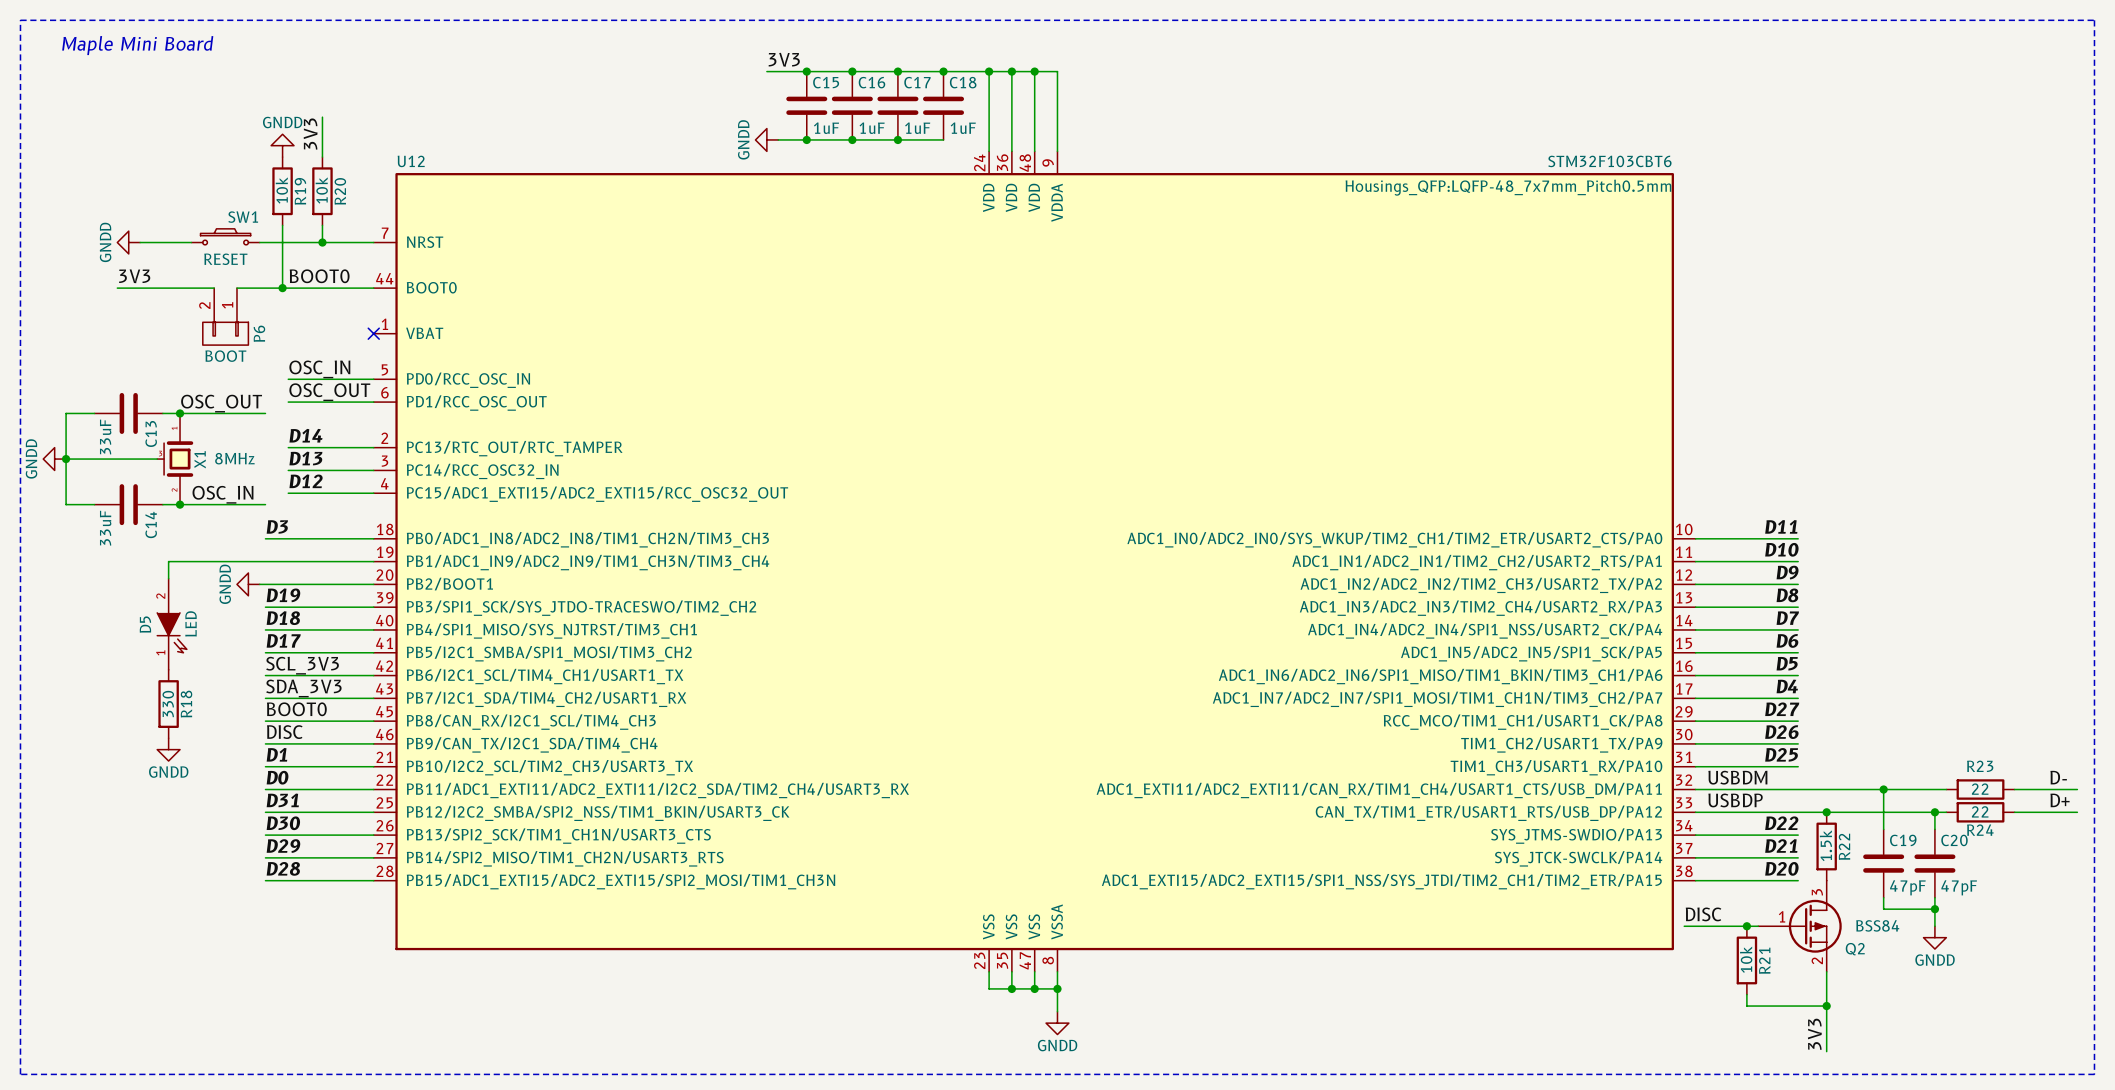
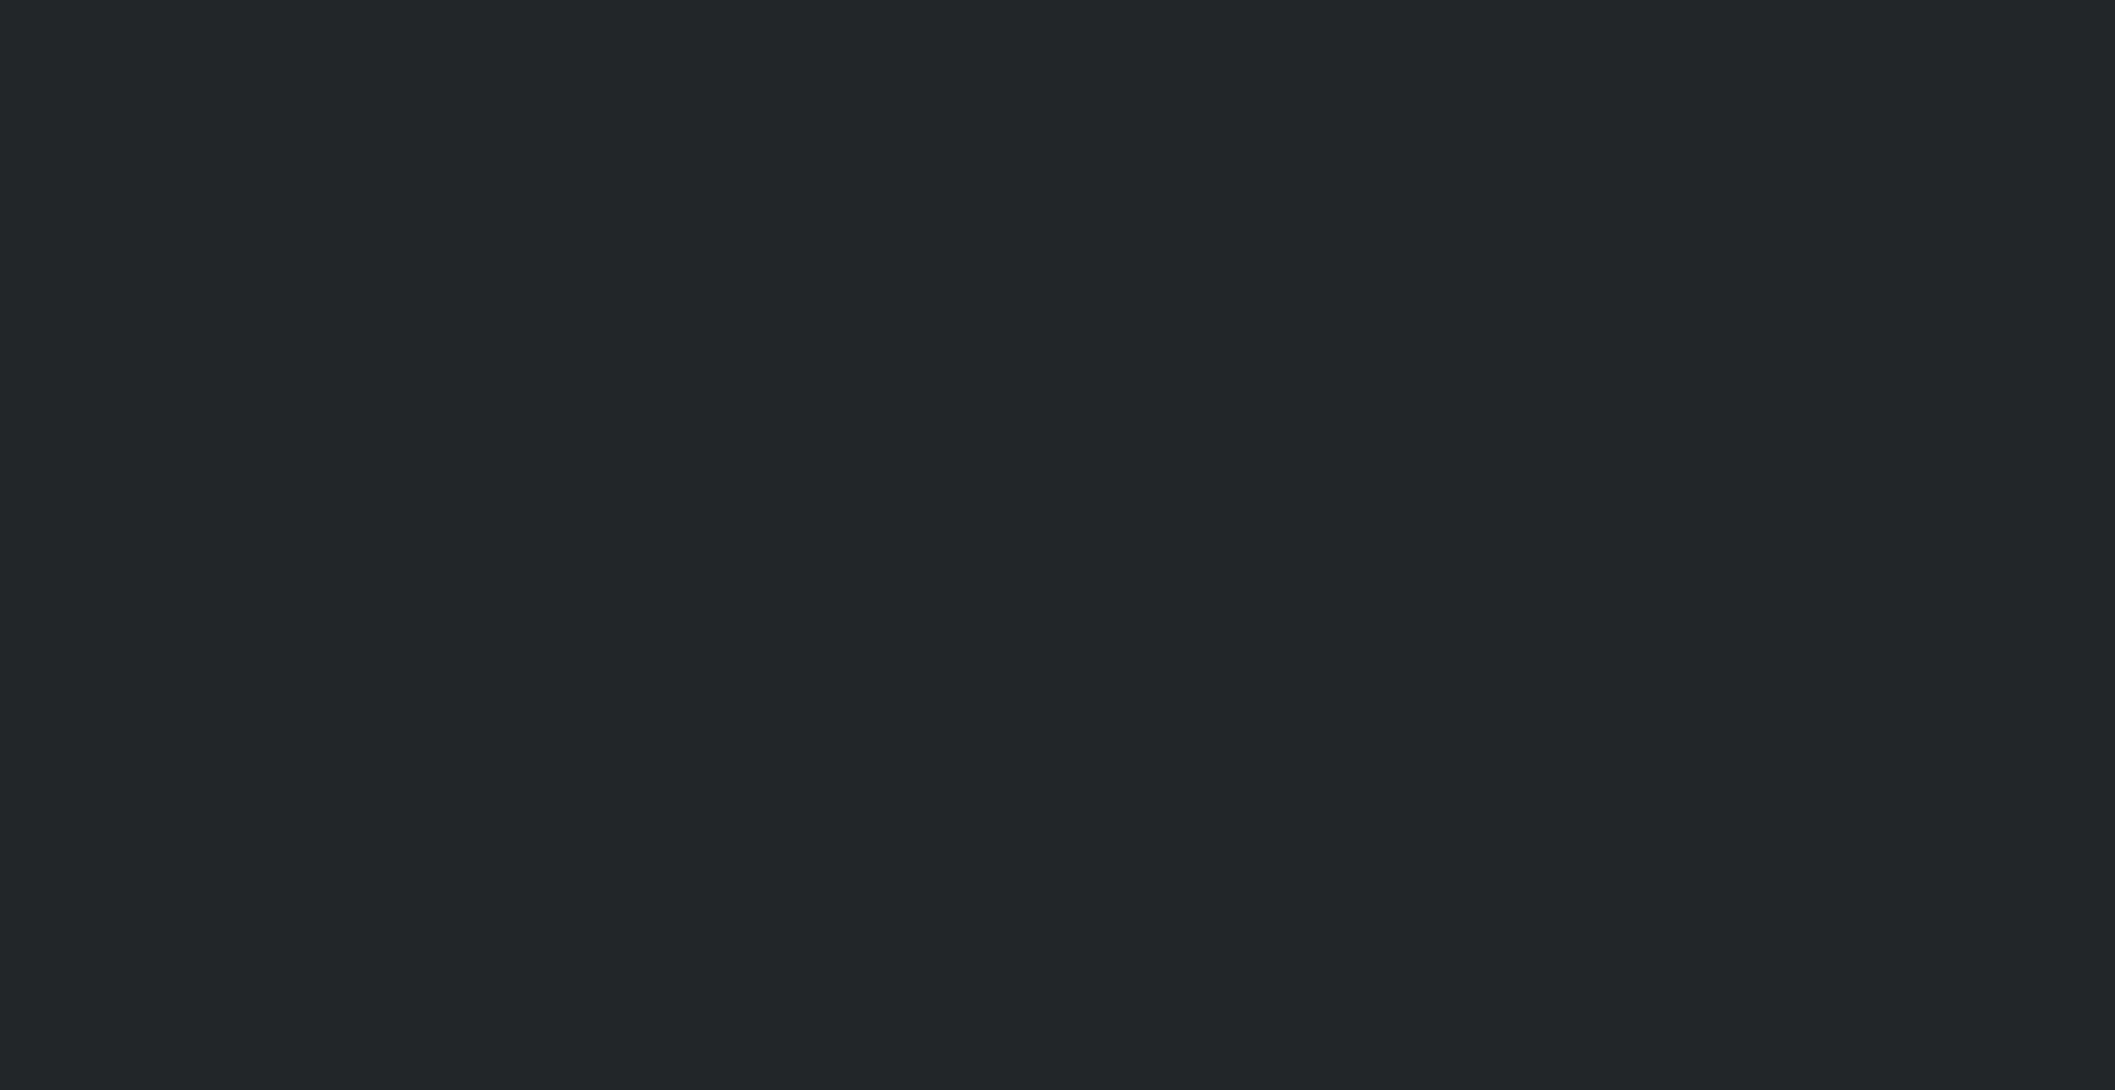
line: (20, 20) (2094, 20) (2094, 1074) (20, 1074) (20, 20) -> none
text: Maple Mini Board (137, 45) -> none
label: 3V3 (784, 59) -> none
wire: (766, 71) (1057, 71) (1057, 151) -> none
junction: (806, 71) -> none
junction: (852, 71) -> none
junction: (897, 71) -> none
junction: (943, 71) -> none
wire: (989, 71) (989, 151) -> none
junction: (989, 71) -> none
wire: (1011, 71) (1011, 151) -> none
junction: (1011, 71) -> none
wire: (1034, 71) (1034, 151) -> none
junction: (1034, 71) -> none
C15: 1uF (806, 105) -> none
C16: 1uF (852, 105) -> none
C17: 1uF (897, 105) -> none
C18: 1uF (943, 105) -> none
wire: (322, 117) (322, 157) -> none
label: 3V3 (310, 134) -> none
power symbol: GNDD (766, 139) -> none
wire: (778, 139) (943, 139) -> none
junction: (806, 139) -> none
junction: (852, 139) -> none
junction: (897, 139) -> none
power symbol: GNDD (282, 145) -> none
R19: 10k (282, 191) -> none
R20: 10k (322, 191) -> none
wire: (282, 225) (282, 288) -> none
wire: (322, 225) (322, 242) -> none
SW1: RESET (225, 236) -> none
power symbol: GNDD (128, 242) -> none
wire: (140, 242) (191, 242) -> none
wire: (259, 242) (373, 242) -> none
junction: (322, 242) -> none
label: 3V3 (134, 276) -> none
label: BOOT0 (319, 276) -> none
wire: (117, 288) (214, 288) -> none
wire: (236, 288) (373, 288) -> none
junction: (282, 288) -> none
P6: BOOT (225, 316) -> none
no-connect mark: (373, 333) -> none
label: OSC_IN (319, 369) -> none
wire: (288, 379) (373, 379) -> none
label: OSC_OUT (329, 392) -> none
wire: (288, 402) (373, 402) -> none
label: OSC_OUT (221, 403) -> none
wire: (94, 413) (66, 413) (66, 504) (94, 504) -> none
C13: 33uF (128, 413) -> none
wire: (162, 413) (265, 413) -> none
junction: (180, 413) -> none
label: D14 (305, 435) -> none
wire: (288, 447) (373, 447) -> none
label: D13 (305, 458) -> none
power symbol: GNDD (54, 459) -> none
wire: (66, 459) (157, 459) -> none
junction: (66, 459) -> none
X1: 8MHz (175, 459) -> none
wire: (288, 470) (373, 470) -> none
label: D12 (306, 481) -> none
wire: (288, 493) (373, 493) -> none
label: OSC_IN (222, 494) -> none
C14: 33uF (128, 504) -> none
wire: (162, 504) (265, 504) -> none
junction: (180, 504) -> none
label: D3 (277, 526) -> none
label: D11 (1781, 526) -> none
wire: (265, 538) (373, 538) -> none
wire: (1695, 538) (1798, 538) -> none
label: D10 (1781, 549) -> none
wire: (373, 561) (168, 561) (168, 578) -> none
U12: STM32F103CBT6 (1034, 561) -> none
wire: (1695, 561) (1798, 561) -> none
label: D9 (1787, 572) -> none
power symbol: GNDD (248, 584) -> none
wire: (259, 584) (373, 584) -> none
wire: (1695, 584) (1798, 584) -> none
label: D19 (283, 595) -> none
label: D8 (1787, 595) -> none
wire: (265, 607) (373, 607) -> none
wire: (1695, 607) (1798, 607) -> none
label: D18 (283, 618) -> none
label: D7 (1787, 618) -> none
D5: LED (172, 624) -> none
wire: (265, 629) (373, 629) -> none
wire: (1695, 629) (1798, 629) -> none
label: D17 (283, 640) -> none
label: D6 (1787, 640) -> none
wire: (265, 652) (373, 652) -> none
wire: (1695, 652) (1798, 652) -> none
label: D5 (1787, 663) -> none
label: SCL_3V3 (302, 665) -> none
wire: (265, 675) (373, 675) -> none
wire: (1695, 675) (1798, 675) -> none
label: D4 (1787, 686) -> none
label: SDA_3V3 (303, 688) -> none
wire: (265, 698) (373, 698) -> none
wire: (1695, 698) (1798, 698) -> none
R18: 330 (168, 704) -> none
label: BOOT0 (296, 709) -> none
label: D27 (1782, 709) -> none
wire: (265, 721) (373, 721) -> none
wire: (1695, 721) (1798, 721) -> none
label: DISC (284, 732) -> none
label: D26 (1781, 732) -> none
wire: (265, 743) (373, 743) -> none
wire: (1695, 743) (1798, 743) -> none
power symbol: GNDD (168, 749) -> none
label: D1 (276, 754) -> none
label: D25 (1781, 754) -> none
wire: (265, 766) (373, 766) -> none
wire: (1695, 766) (1798, 766) -> none
label: D0 (277, 777) -> none
label: USBDM (1737, 777) -> none
label: D- (2058, 777) -> none
wire: (265, 789) (373, 789) -> none
wire: (1695, 789) (1946, 789) -> none
wire: (1883, 789) (1883, 829) -> none
junction: (1883, 789) -> none
R23: 22 (1980, 789) -> none
wire: (2014, 789) (2077, 789) -> none
label: D31 (282, 800) -> none
label: USBDP (1735, 800) -> none
label: D+ (2060, 800) -> none
wire: (265, 812) (373, 812) -> none
wire: (1695, 812) (1946, 812) -> none
junction: (1826, 812) -> none
wire: (1934, 812) (1934, 829) -> none
junction: (1934, 812) -> none
R24: 22 (1980, 812) -> none
wire: (2014, 812) (2077, 812) -> none
label: D30 (283, 823) -> none
label: D22 (1781, 823) -> none
wire: (265, 835) (373, 835) -> none
wire: (1695, 835) (1798, 835) -> none
label: D21 (1781, 845) -> none
label: D29 (283, 846) -> none
R22: 1.5k (1826, 846) -> none
wire: (265, 857) (373, 857) -> none
wire: (1695, 857) (1798, 857) -> none
C19: 47pF (1883, 863) -> none
C20: 47pF (1934, 863) -> none
label: D28 (283, 868) -> none
label: D20 (1781, 868) -> none
wire: (265, 880) (373, 880) -> none
wire: (1695, 880) (1798, 880) -> none
wire: (1883, 897) (1883, 909) (1934, 909) -> none
wire: (1934, 897) (1934, 926) -> none
junction: (1934, 909) -> none
label: DISC (1703, 914) -> none
wire: (1684, 926) (1758, 926) -> none
junction: (1746, 926) -> none
Q2: BSS84 (1800, 926) -> none
power symbol: GNDD (1934, 937) -> none
R21: 10k (1746, 960) -> none
wire: (989, 971) (989, 988) (1057, 988) -> none
wire: (1011, 971) (1011, 988) -> none
wire: (1034, 971) (1034, 988) -> none
wire: (1057, 971) (1057, 1011) -> none
wire: (1826, 971) (1826, 1051) -> none
junction: (1011, 988) -> none
junction: (1034, 988) -> none
junction: (1057, 988) -> none
wire: (1746, 994) (1746, 1006) (1826, 1006) -> none
junction: (1826, 1006) -> none
power symbol: GNDD (1057, 1023) -> none
label: 3V3 (1814, 1034) -> none

